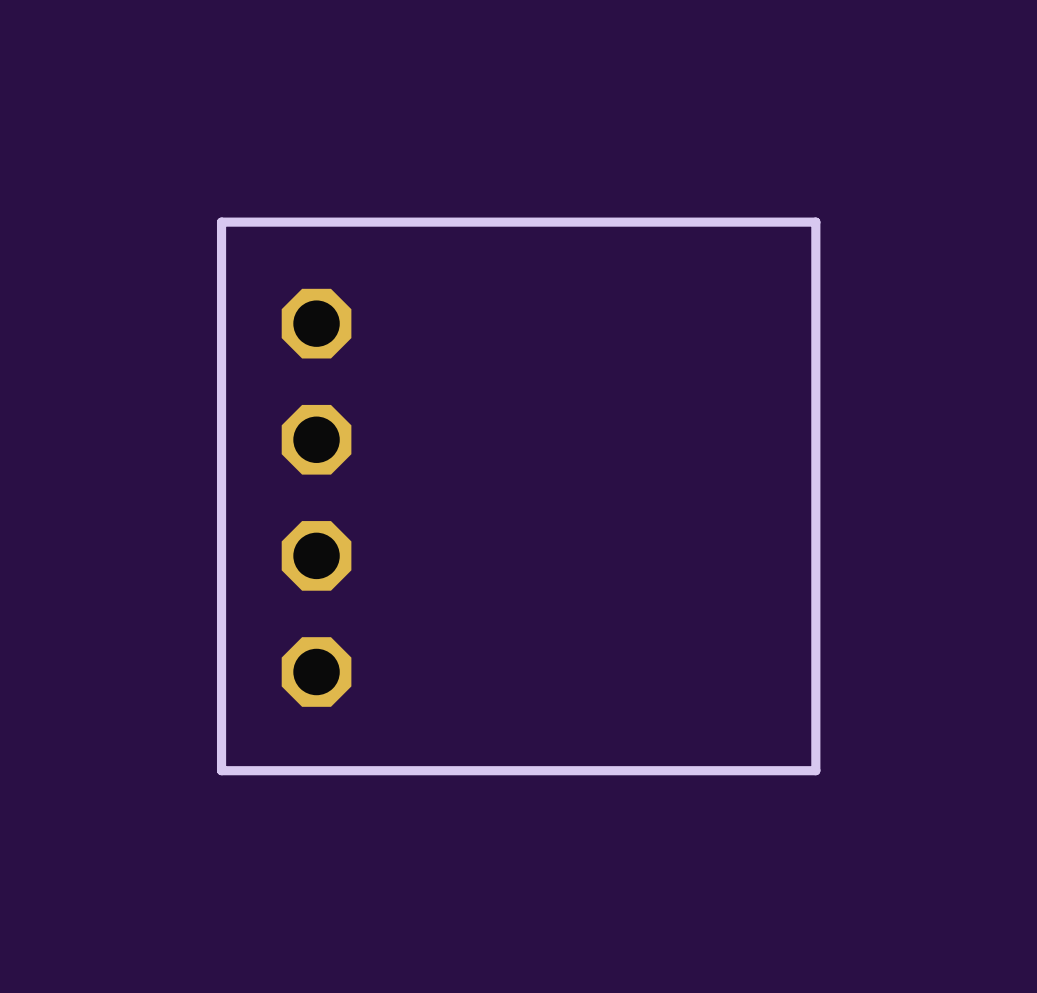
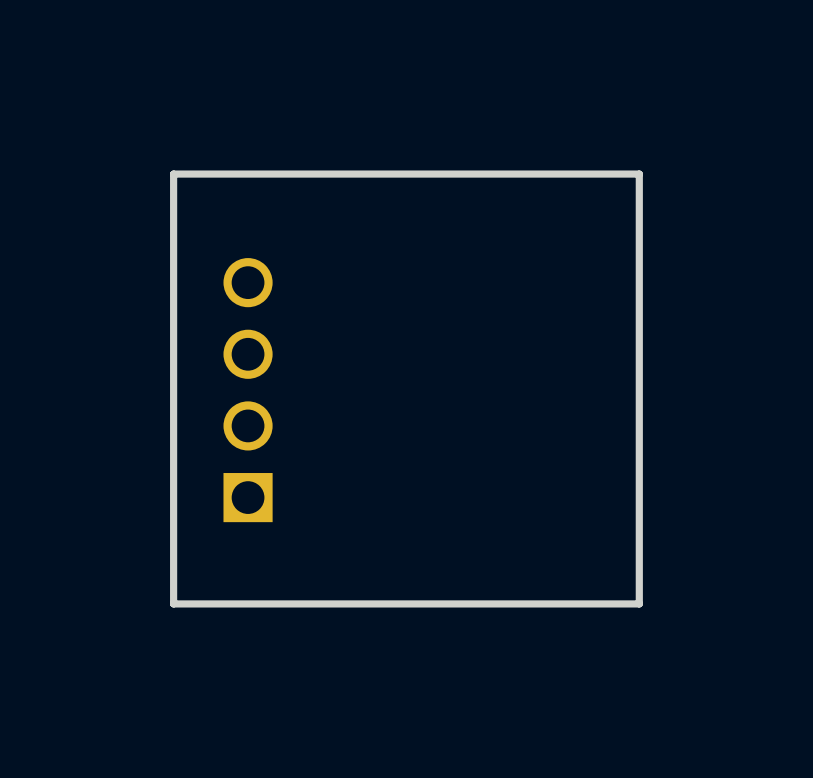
part: (316, 323) -> none
part: (316, 439) -> none
part: none -> (248, 390)
part: (316, 555) -> none
part: (316, 672) -> none

